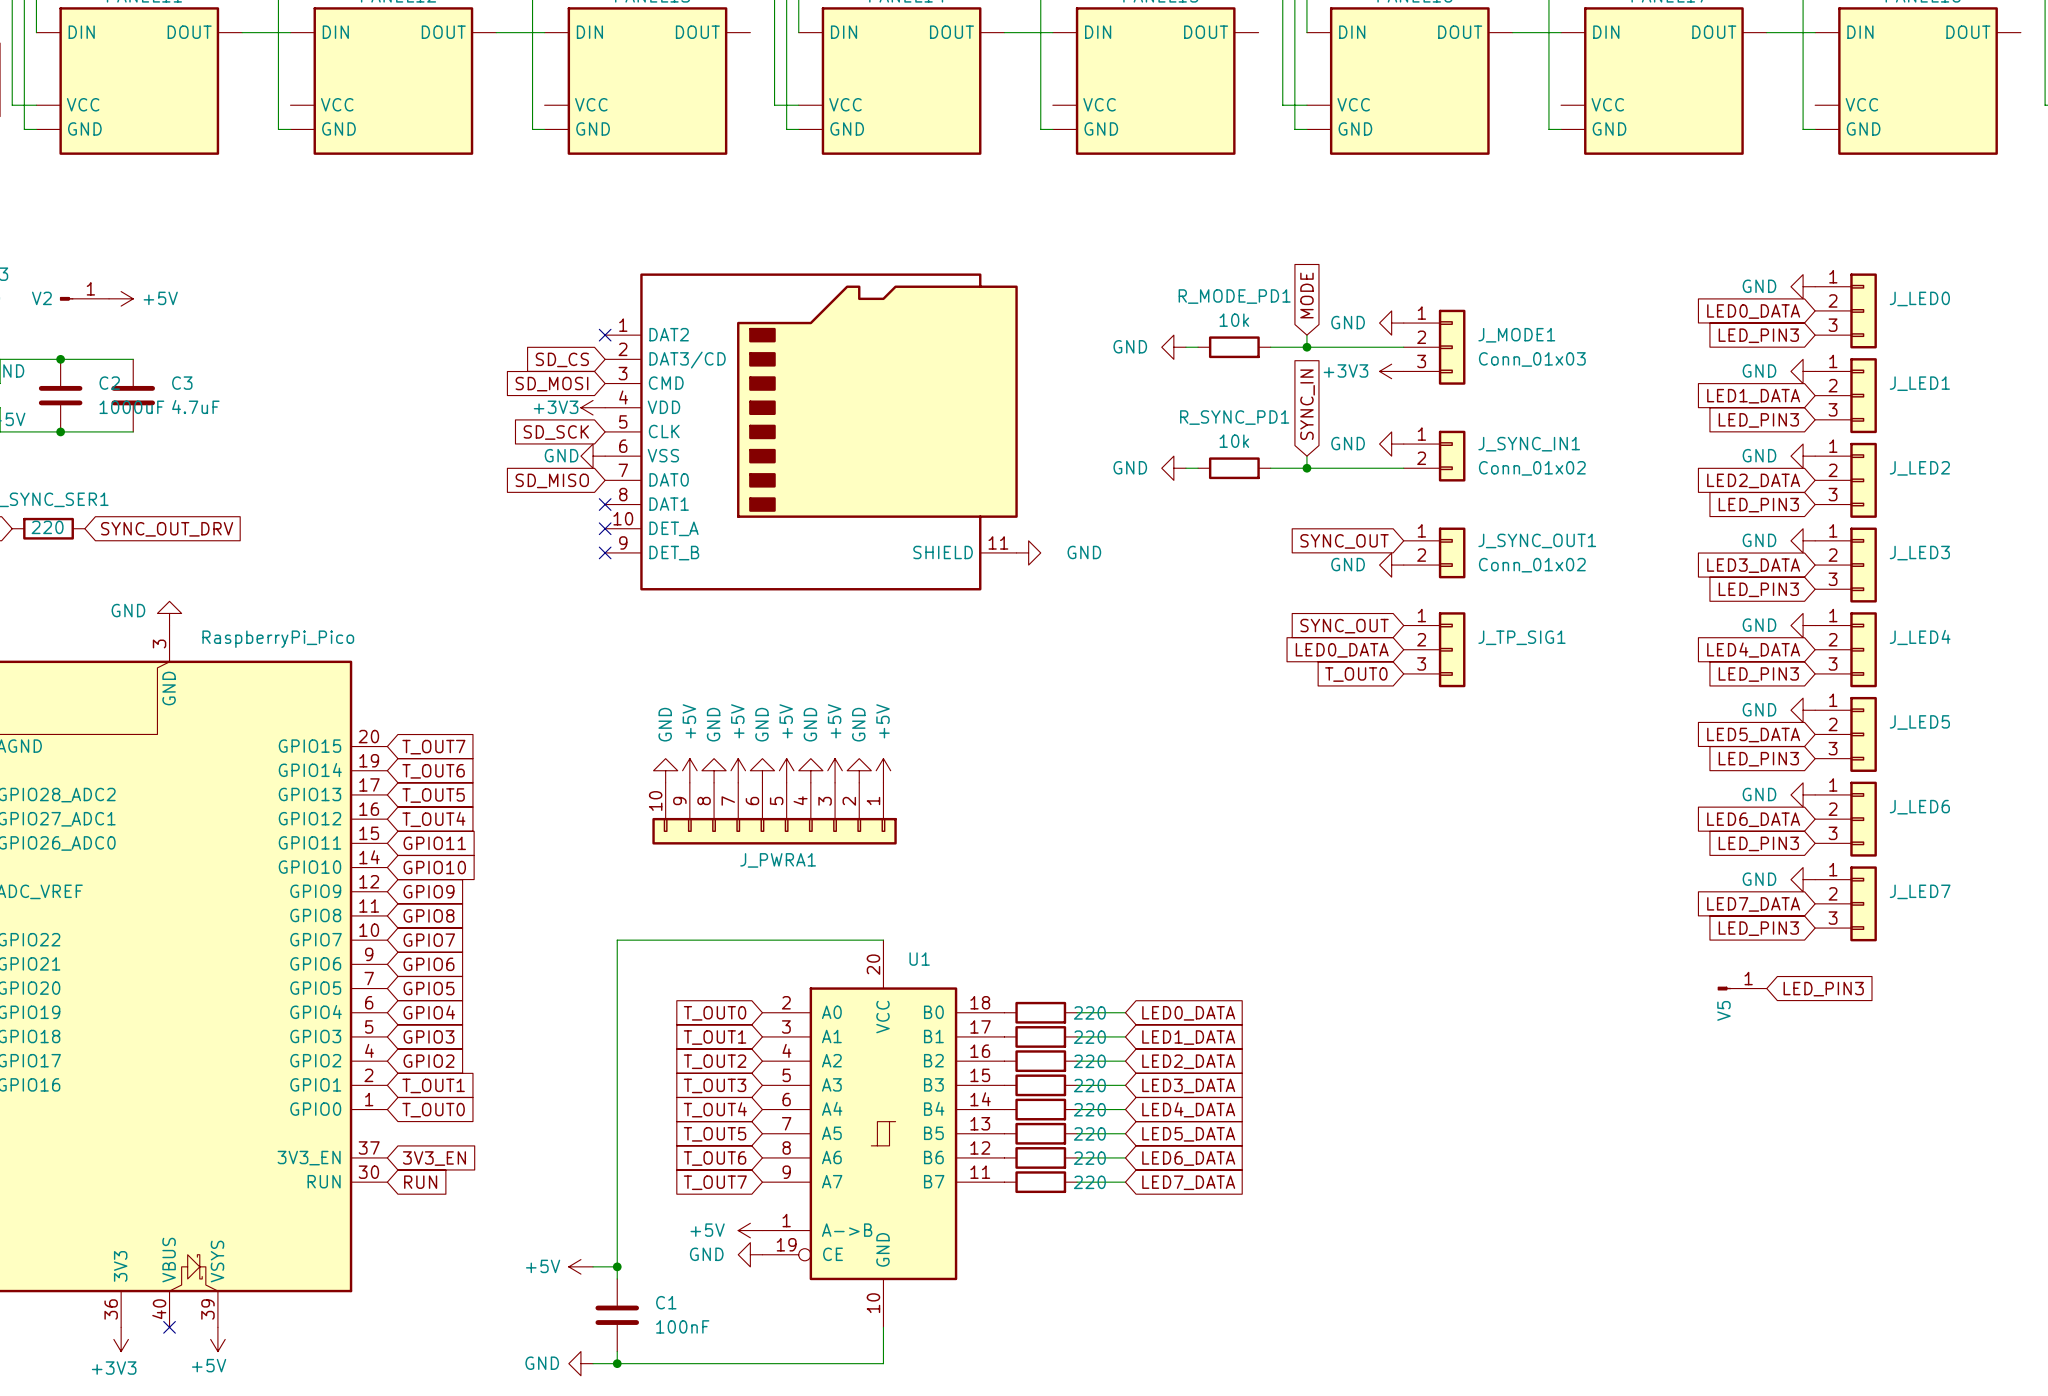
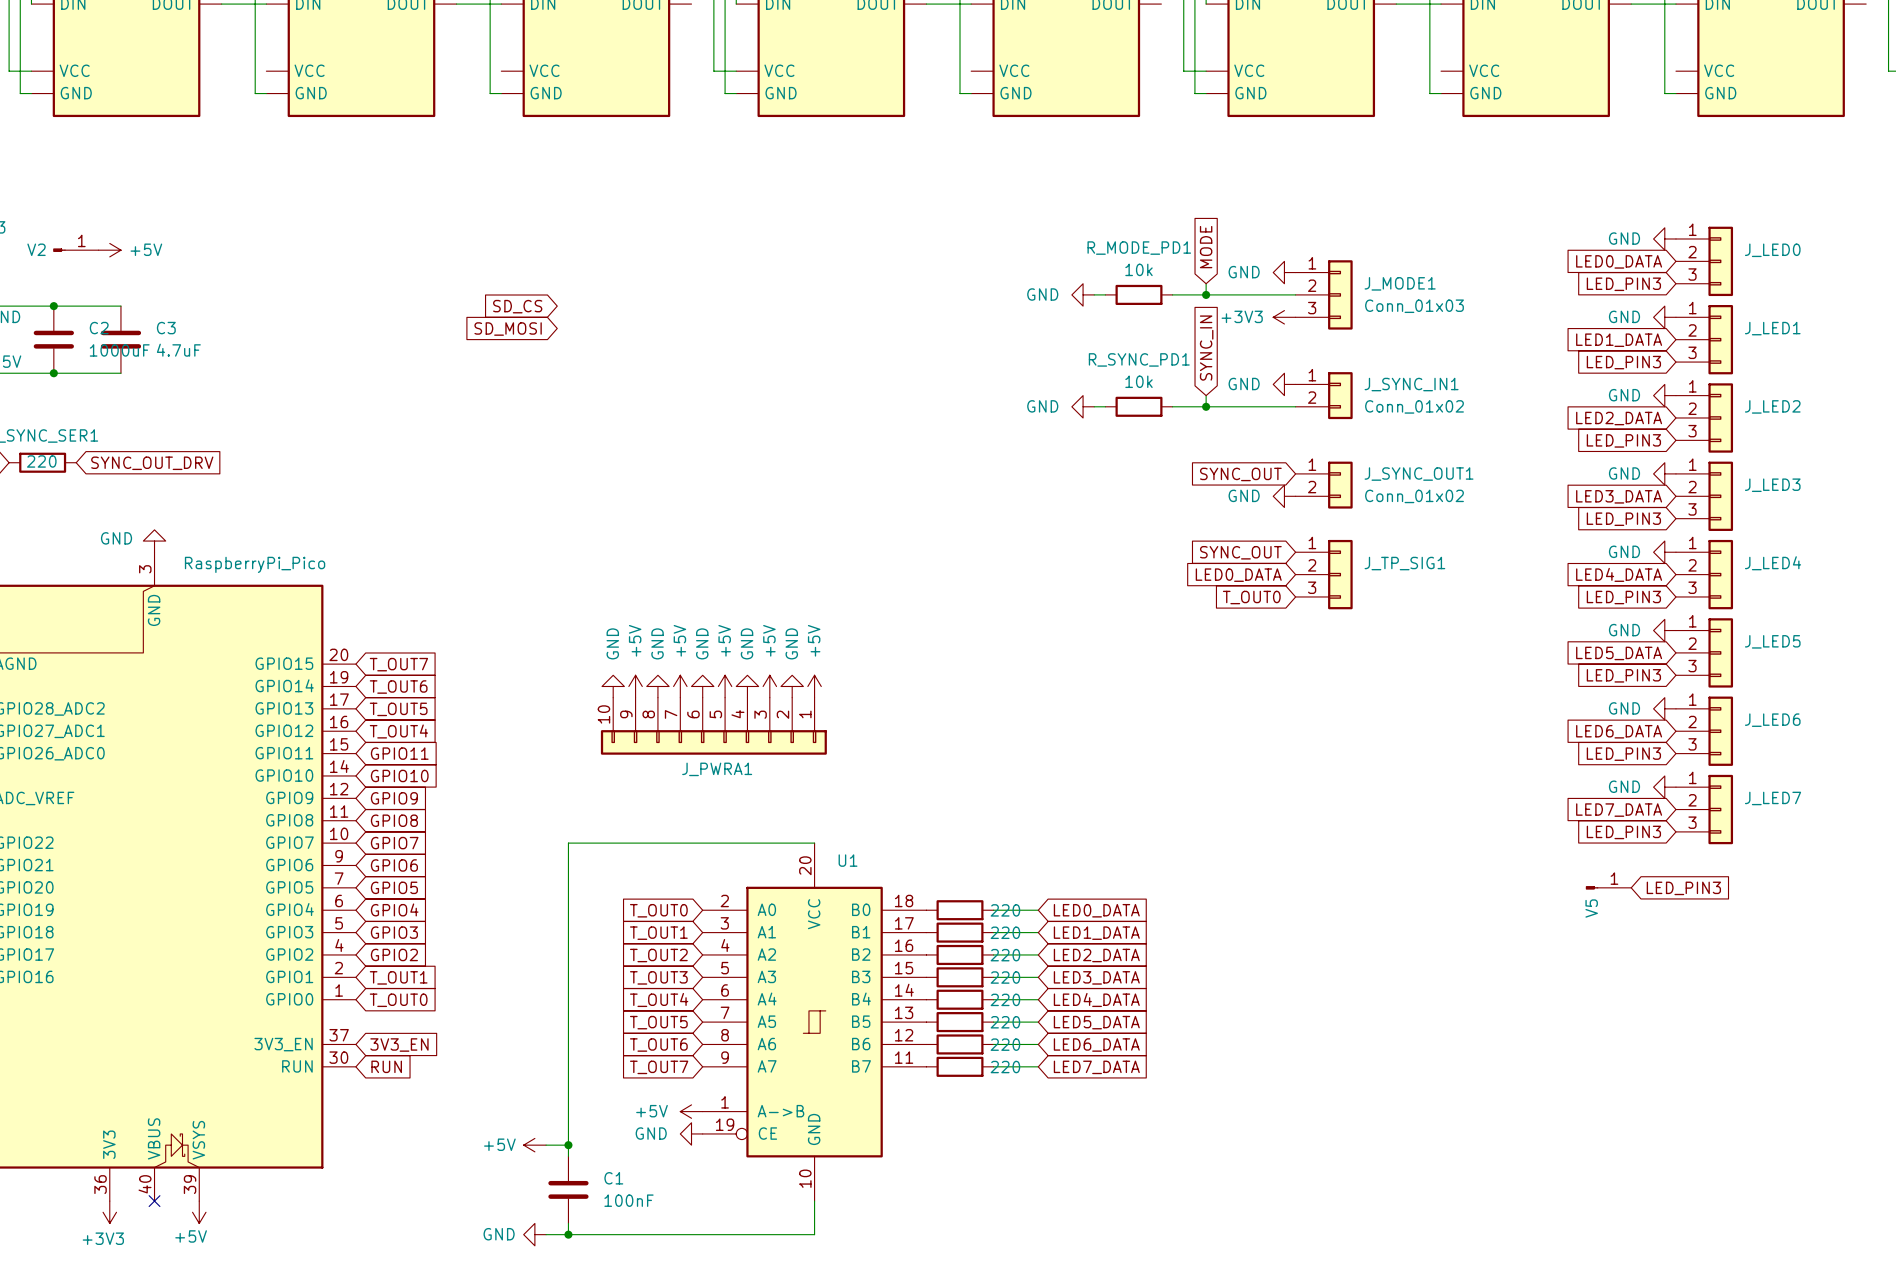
no-connect mark: (605, 335) -> none
power symbol: +3V3 (593, 407) -> none
part: (811, 431) -> none
global label: SD_SCK (556, 432) -> none
power symbol: GND (593, 456) -> none
global label: SD_MISO (552, 480) -> none
no-connect mark: (605, 504) -> none
no-connect mark: (605, 528) -> none
no-connect mark: (605, 552) -> none
power symbol: GND (1028, 552) -> none

